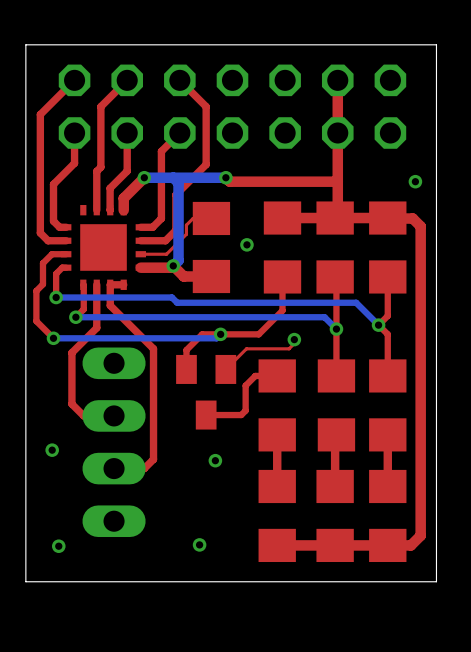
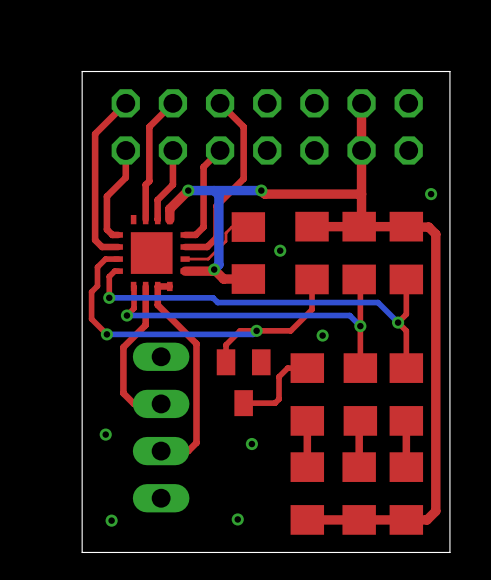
top track: (294, 339) (294, 343) (289, 348) (246, 348) (225, 369) -> none

